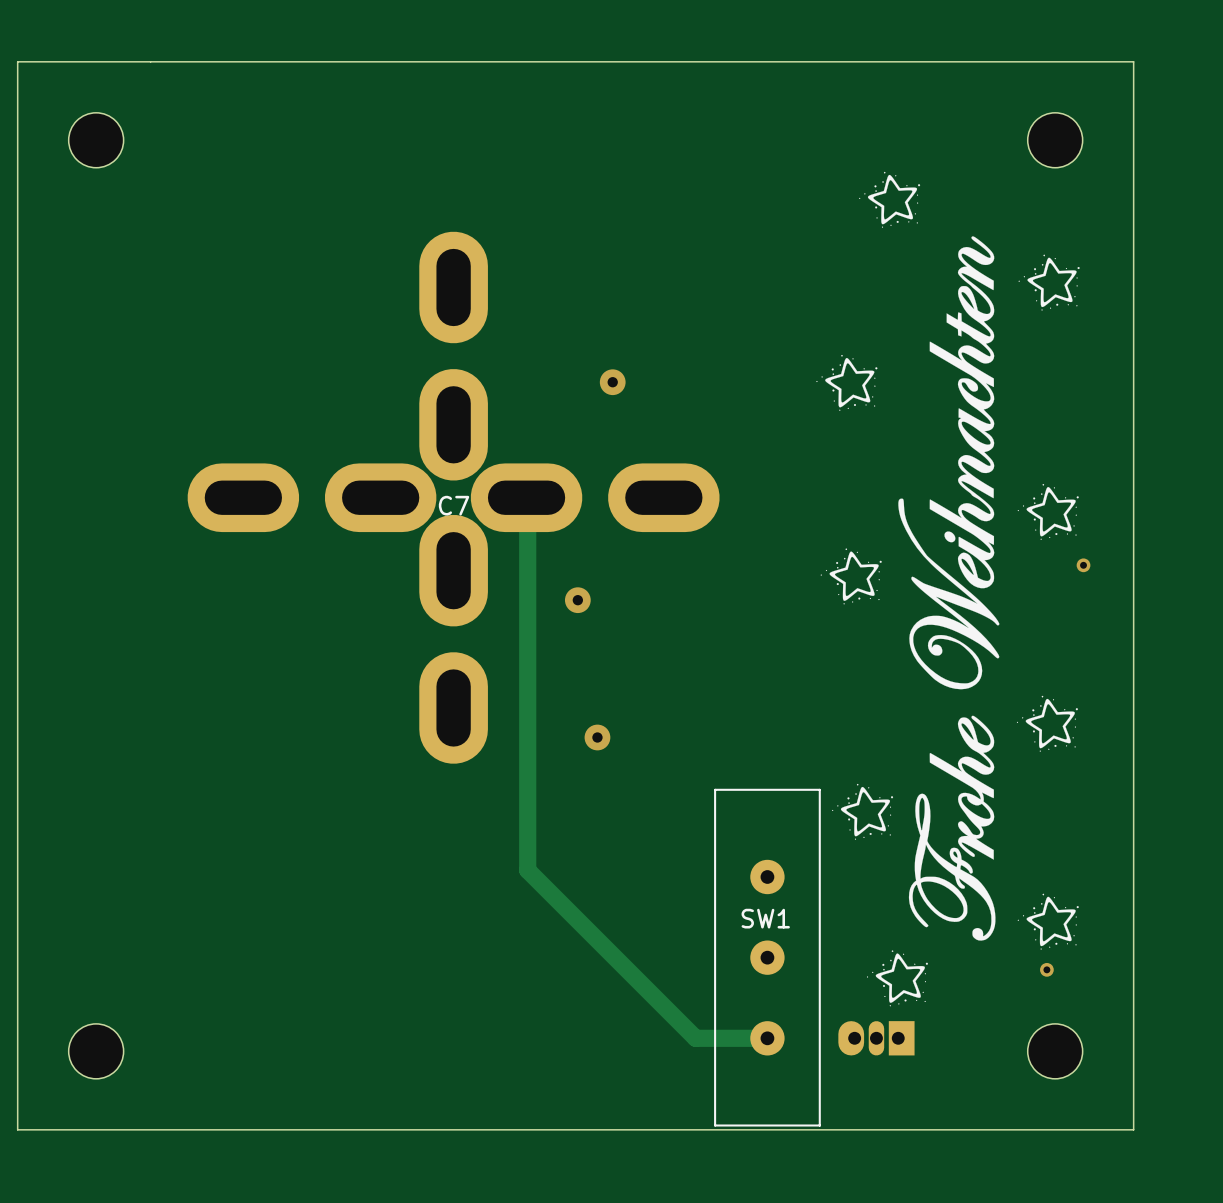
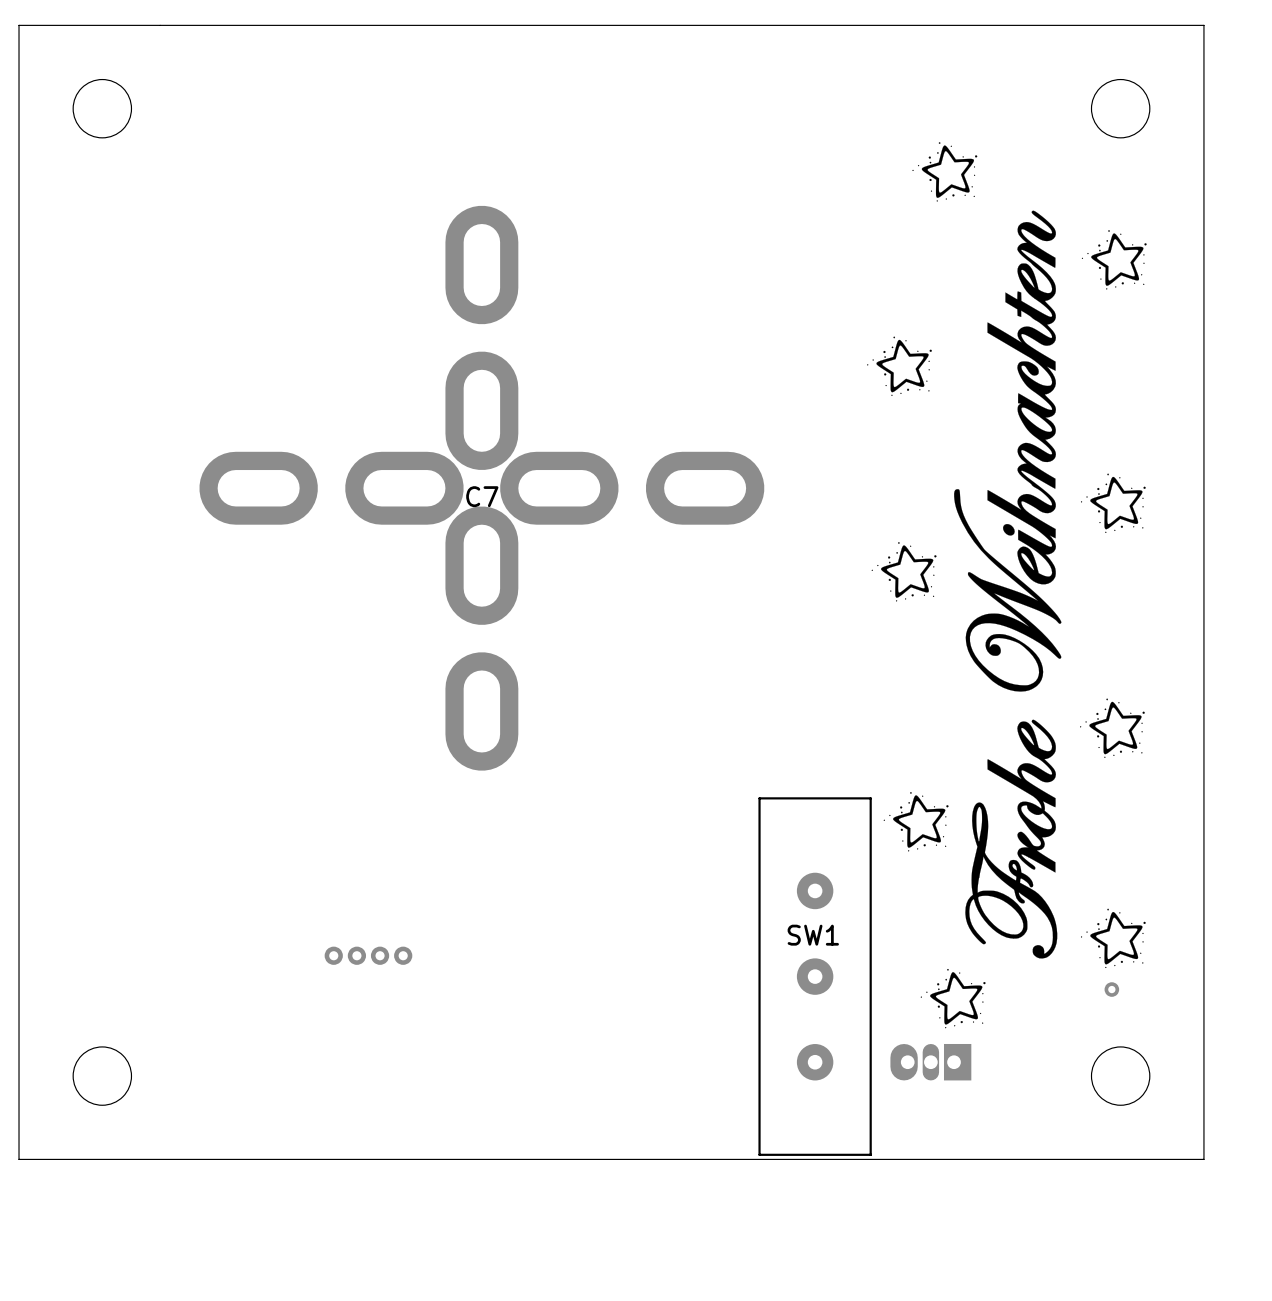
via: (612, 382) -> none
track: (527, 497) (527, 870) (695, 1038) (767, 1038) -> none
via: (1083, 565) -> none
via: (577, 600) -> none
via: (597, 737) -> none
via: none -> (333, 955)
via: none -> (356, 955)
via: none -> (380, 955)
via: none -> (403, 955)

